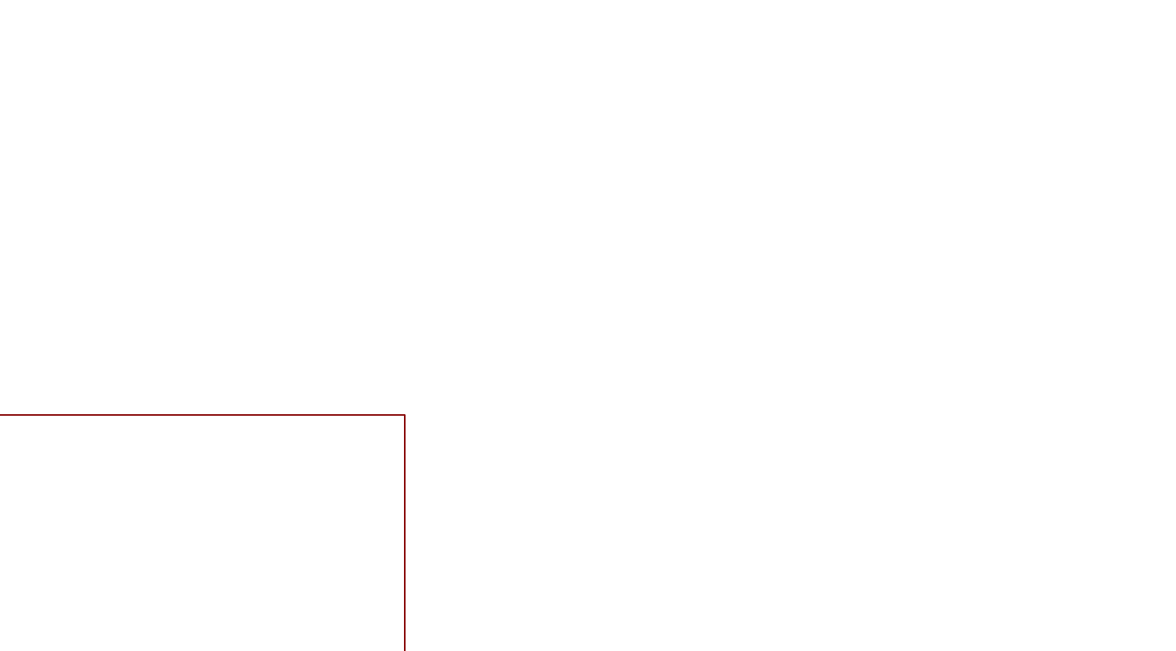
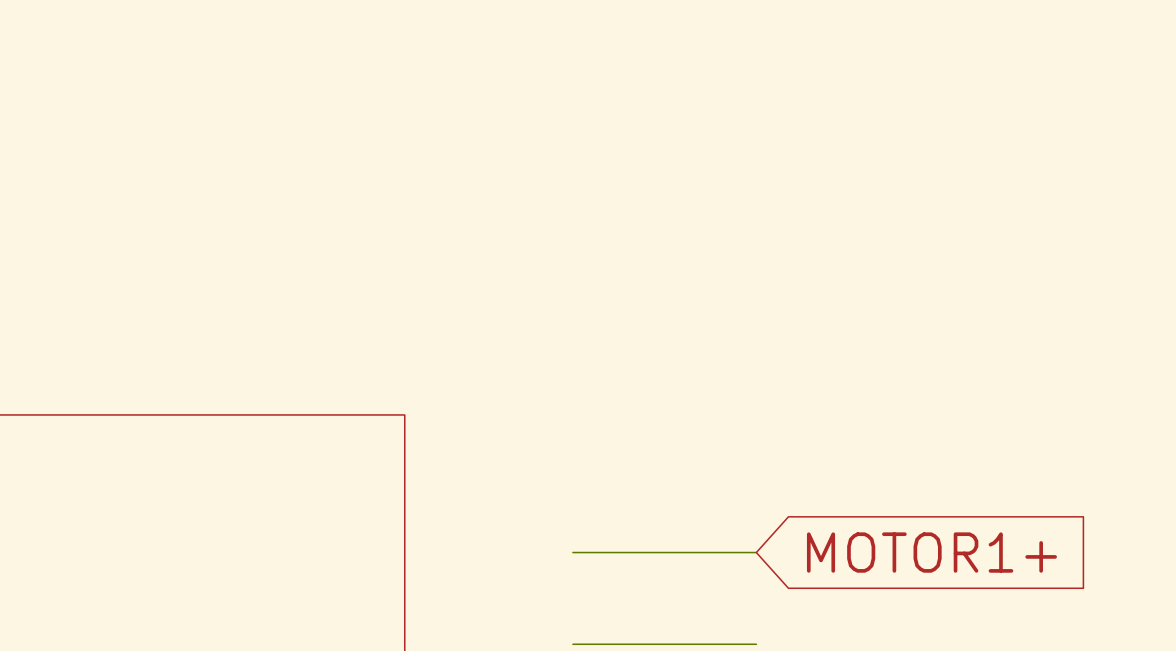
wire: none -> (572, 552) (756, 552)
global label: none -> MOTOR1+ (931, 552)
wire: none -> (572, 644) (756, 644)

